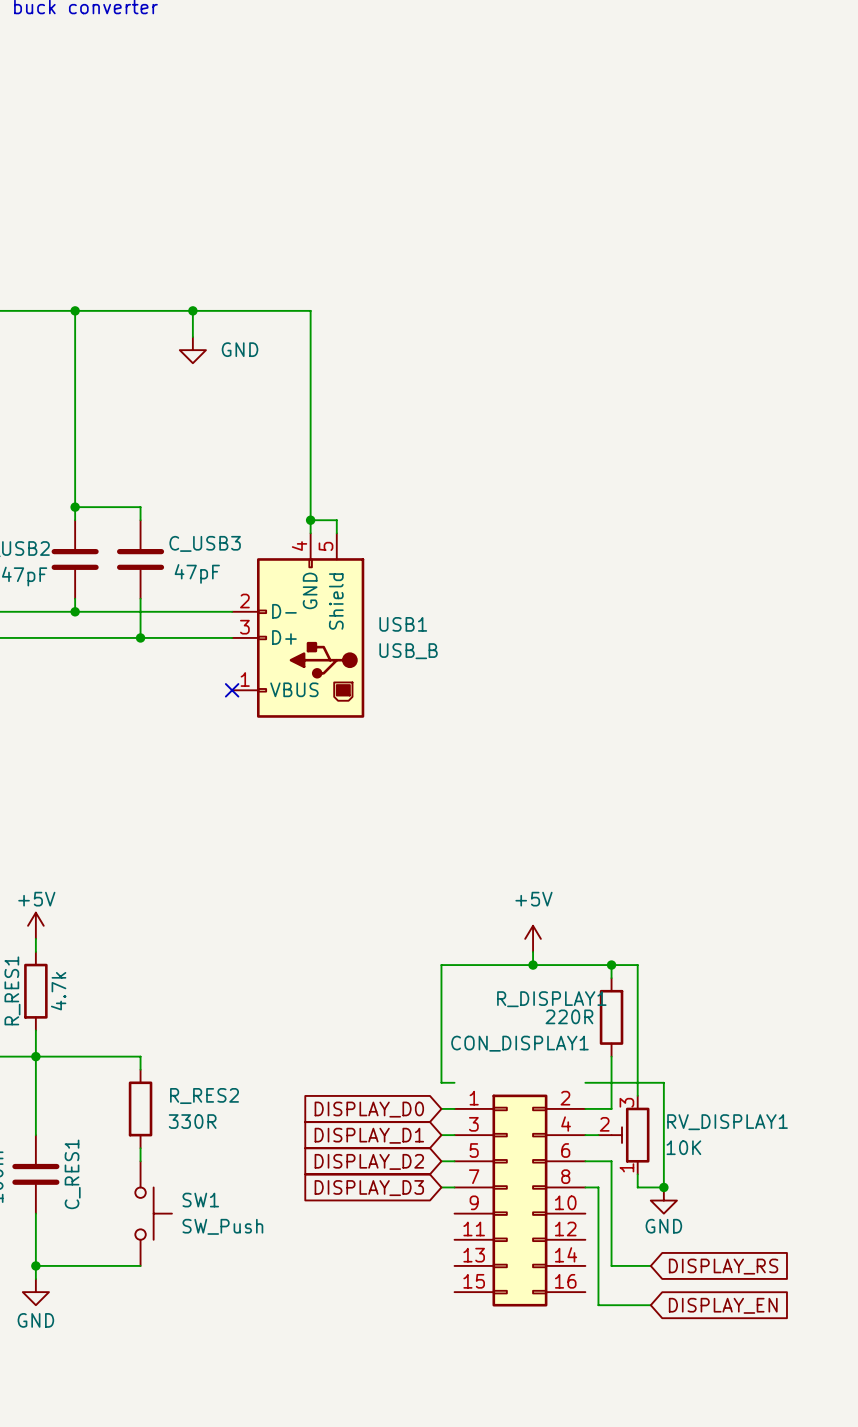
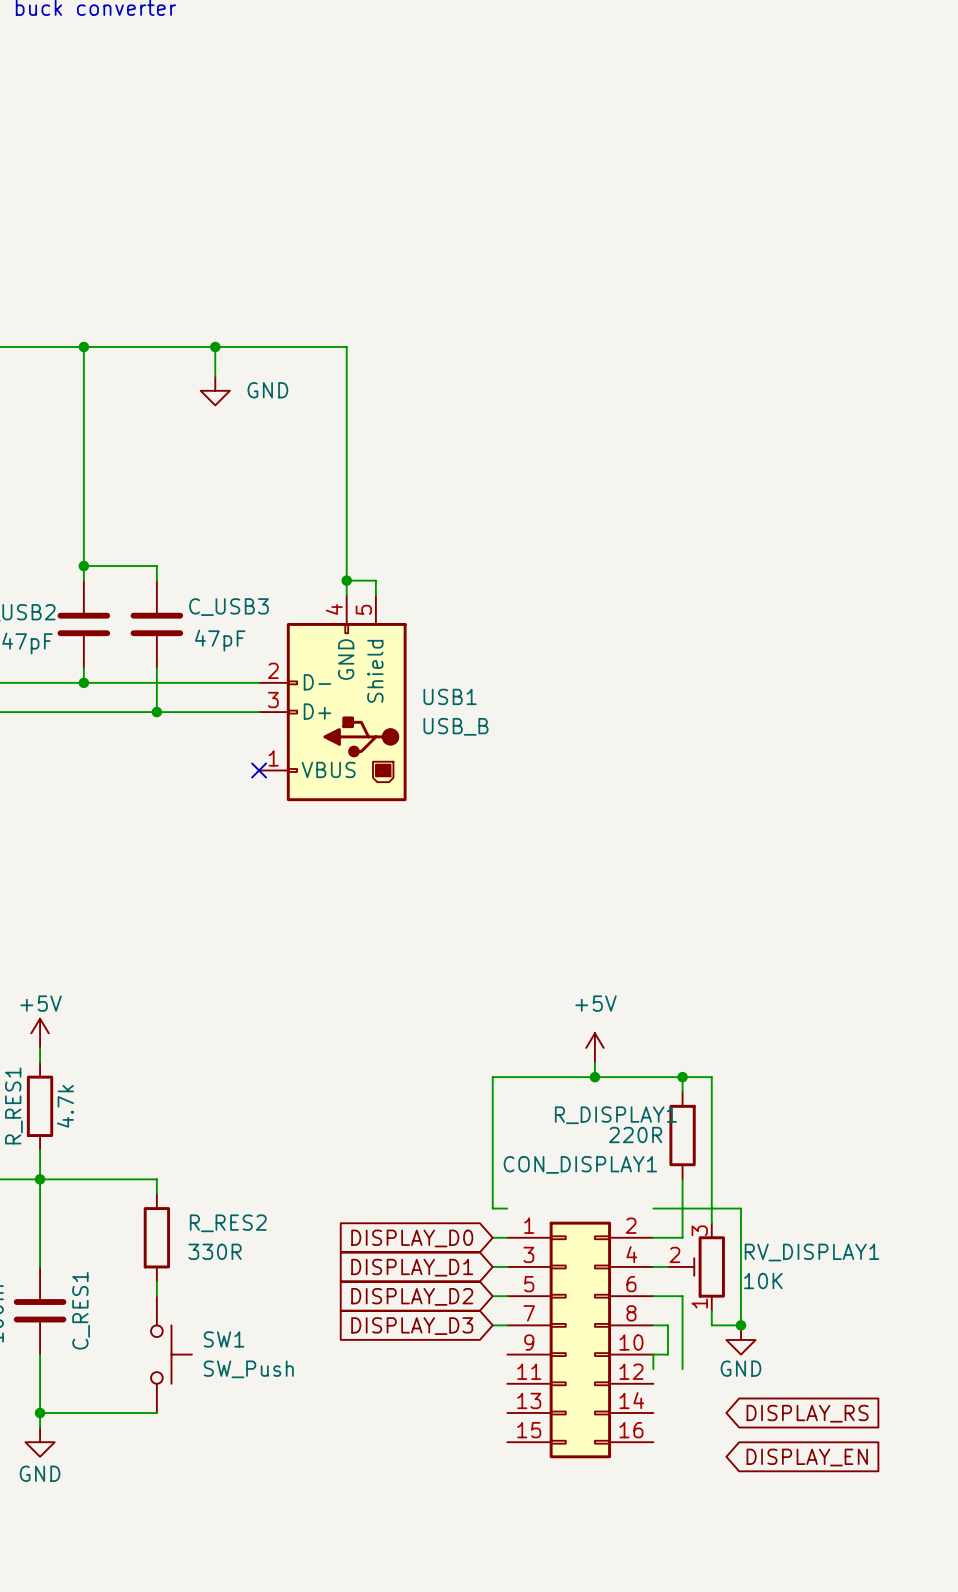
wire: (598, 1213) (598, 1305) (650, 1305) -> (667, 1354) (653, 1354) (653, 1369)
wire: (611, 1226) (611, 1265) (650, 1265) -> none

